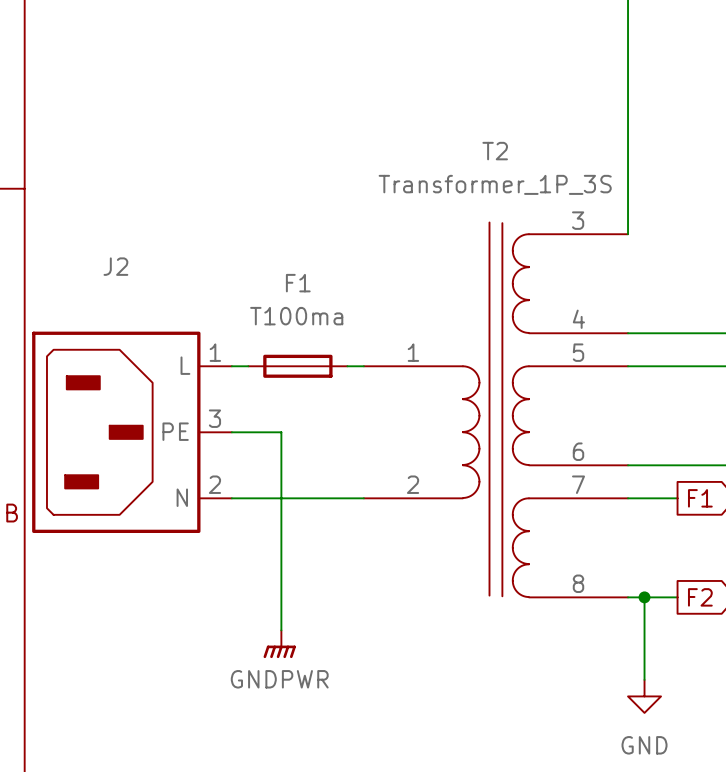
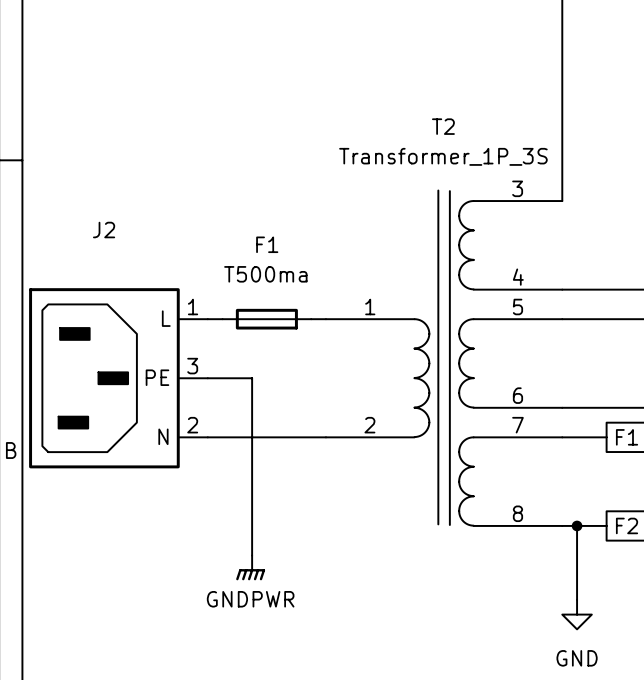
F1 value: T100ma (296, 316) -> T500ma (265, 274)

